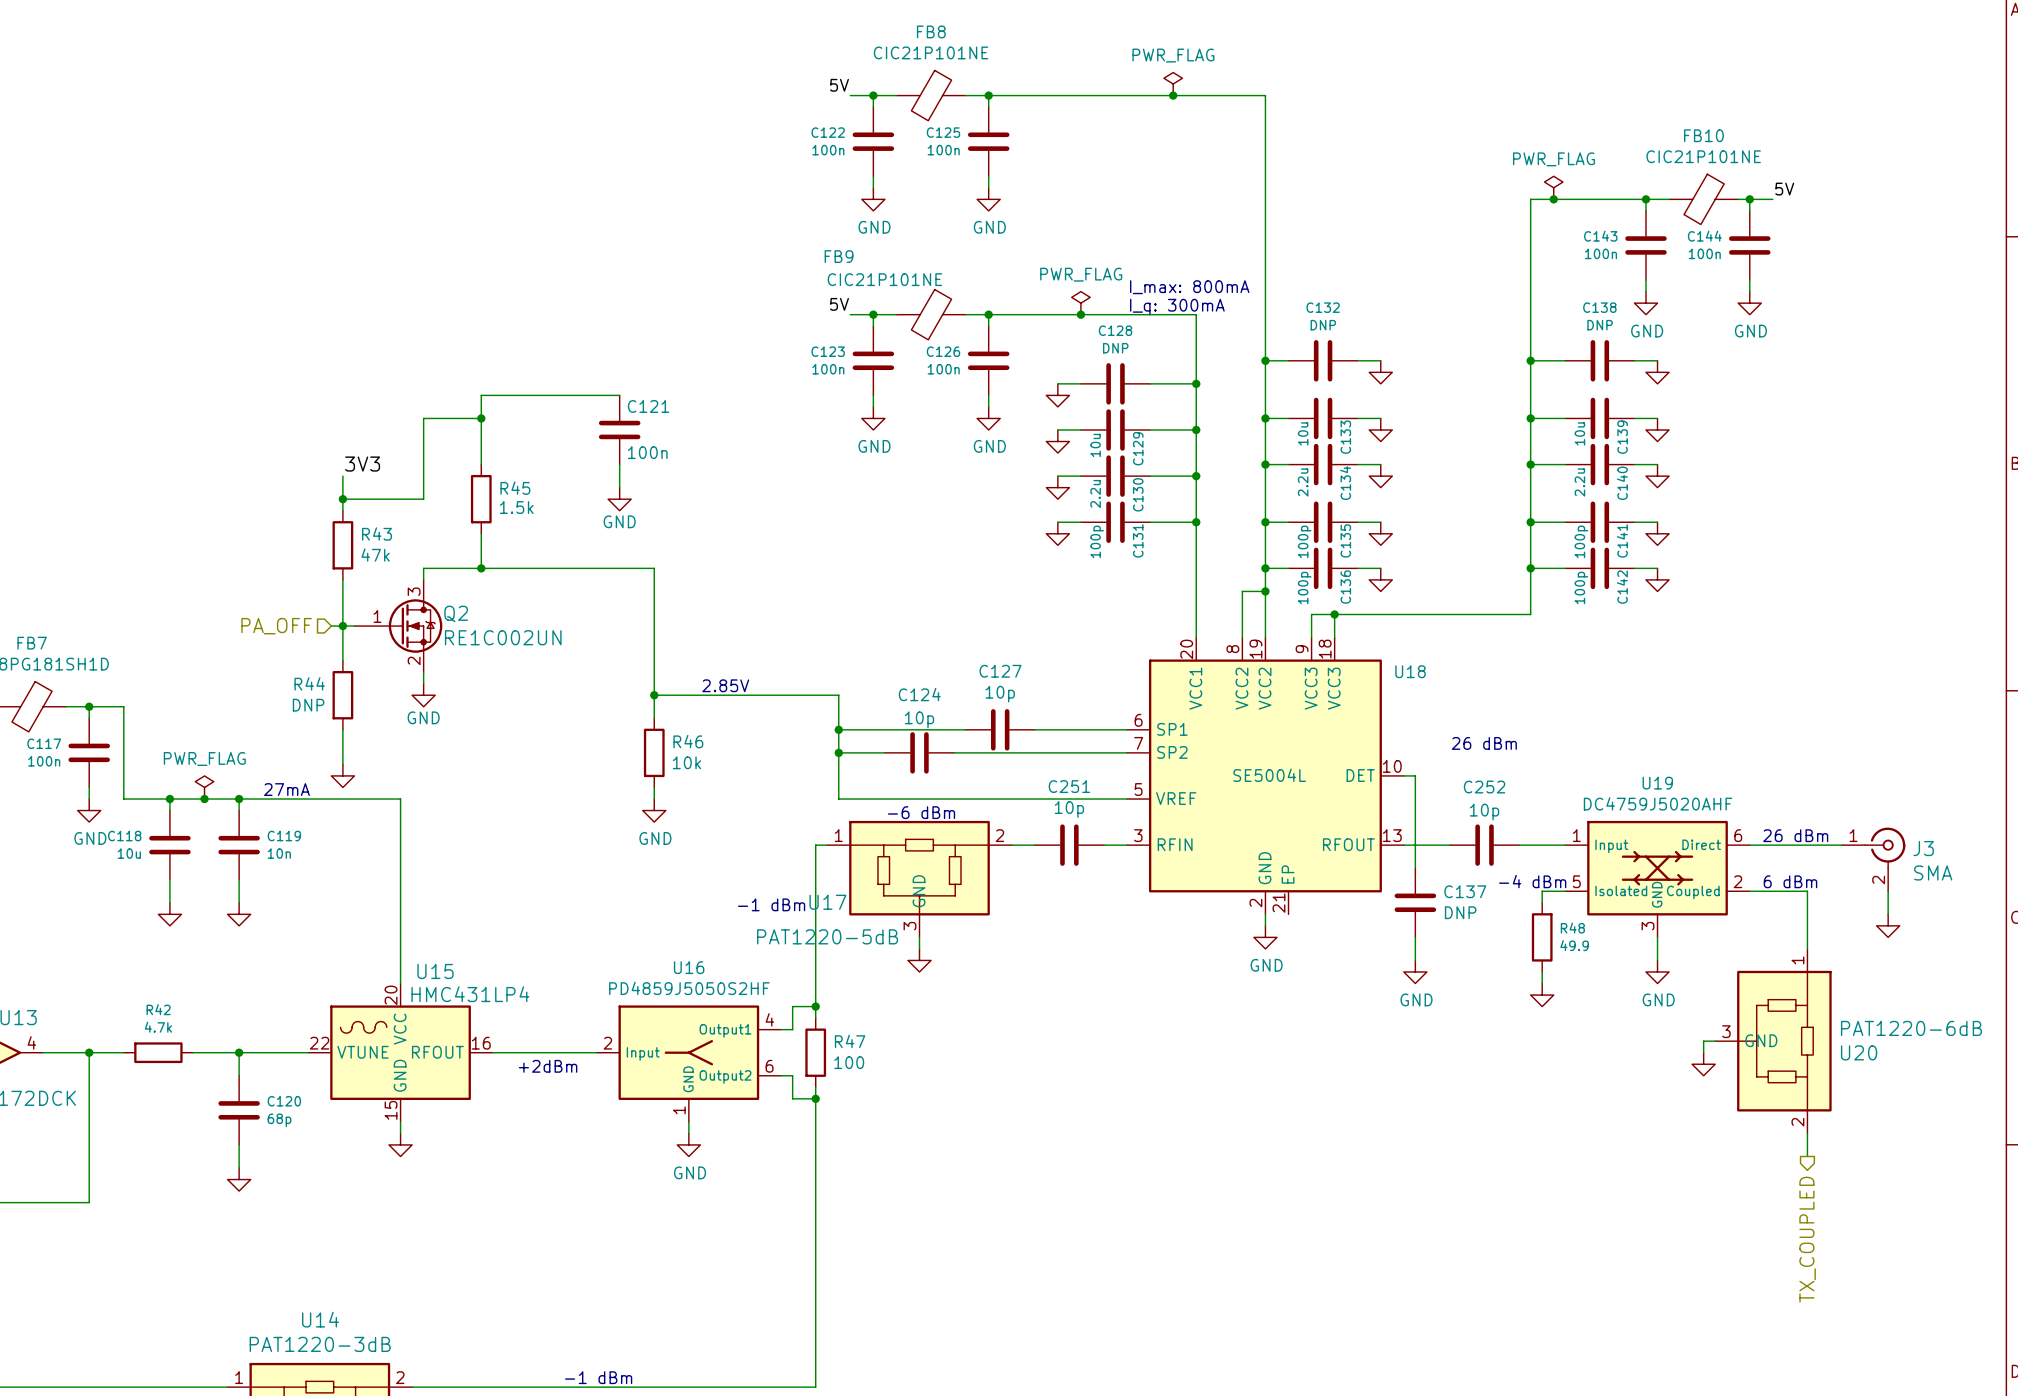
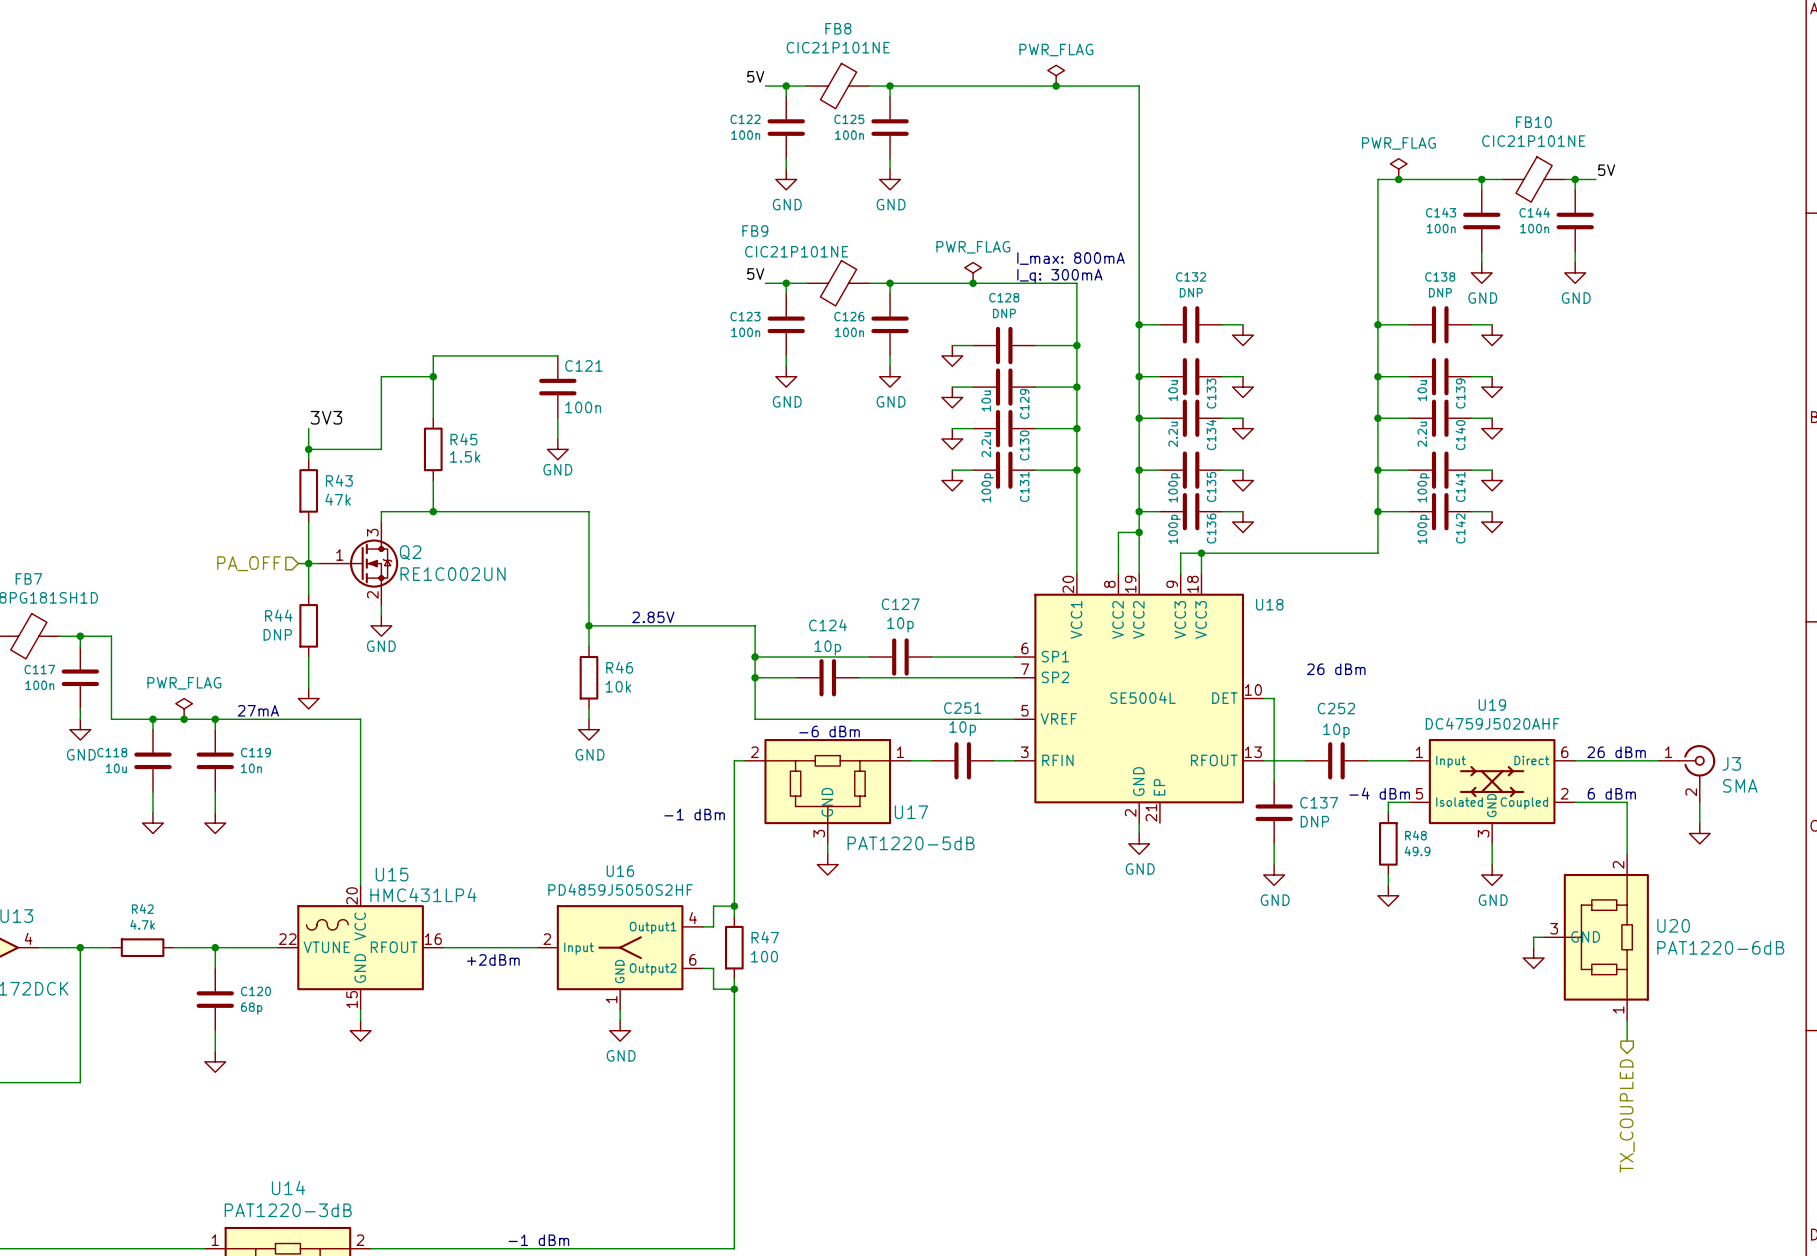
U17 flip: as is (919, 868) -> left-right (827, 781)
U20 flip: as is (1784, 1041) -> up-down (1606, 937)

